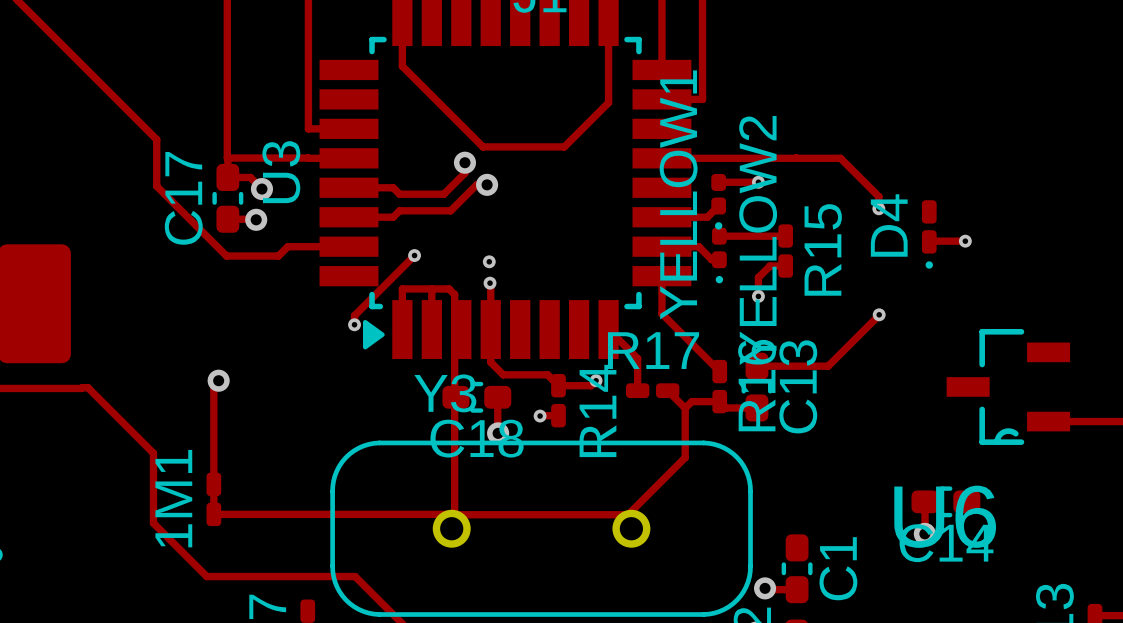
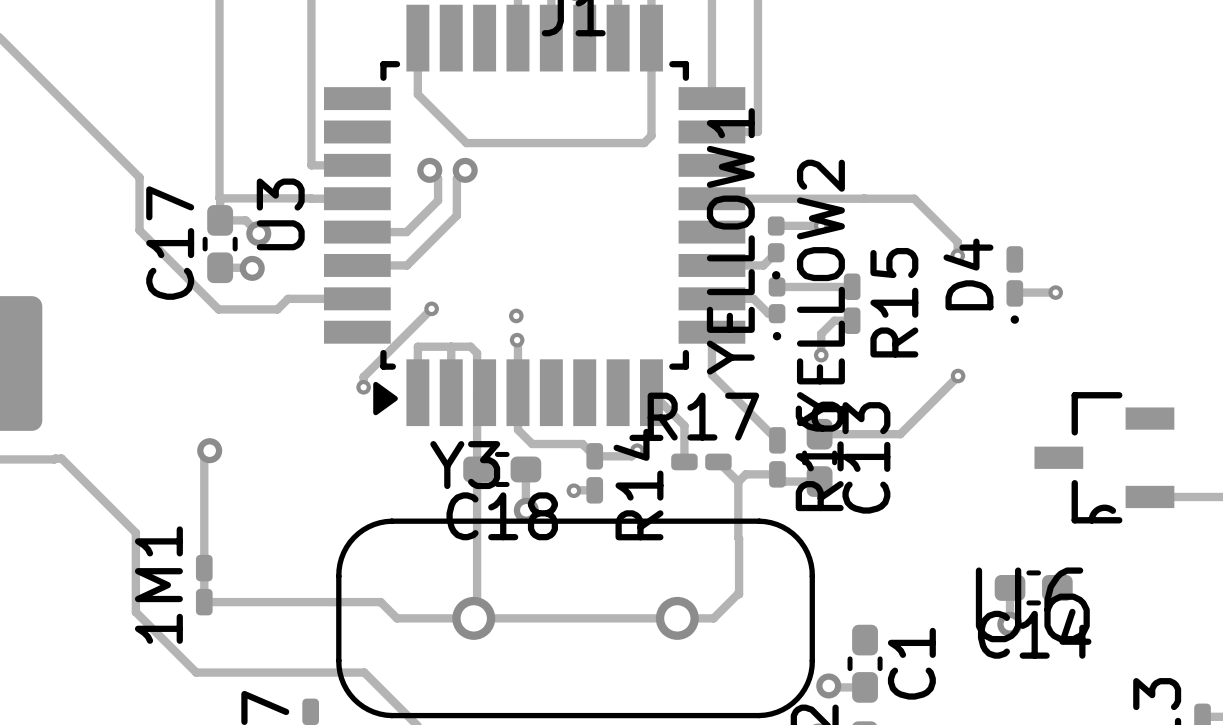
track: (445, 109) (482, 146) (564, 146) (602, 109) -> (466, 143) (644, 143)
via: none -> (429, 170)
via: none -> (465, 170)
track: (464, 162) (464, 173) (443, 194) (399, 194) (392, 187) -> (429, 170) (438, 178) (438, 200) (406, 232)
via: (464, 162) -> none
track: (487, 184) (476, 184) (450, 210) (399, 210) (393, 217) -> (465, 170) (456, 178) (456, 215) (407, 265)
via: (487, 184) -> none
track: (685, 457) (628, 514) (454, 514) -> (738, 537) (739, 594) (713, 618) (397, 618) (380, 602)
track: (369, 514) (448, 514) -> none

